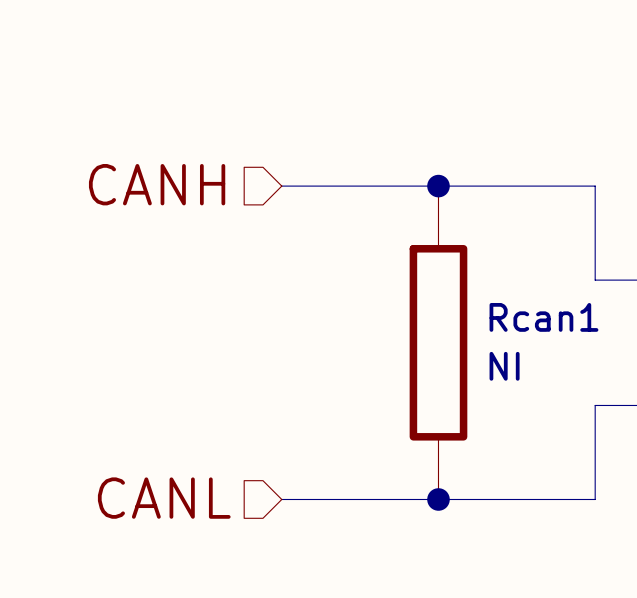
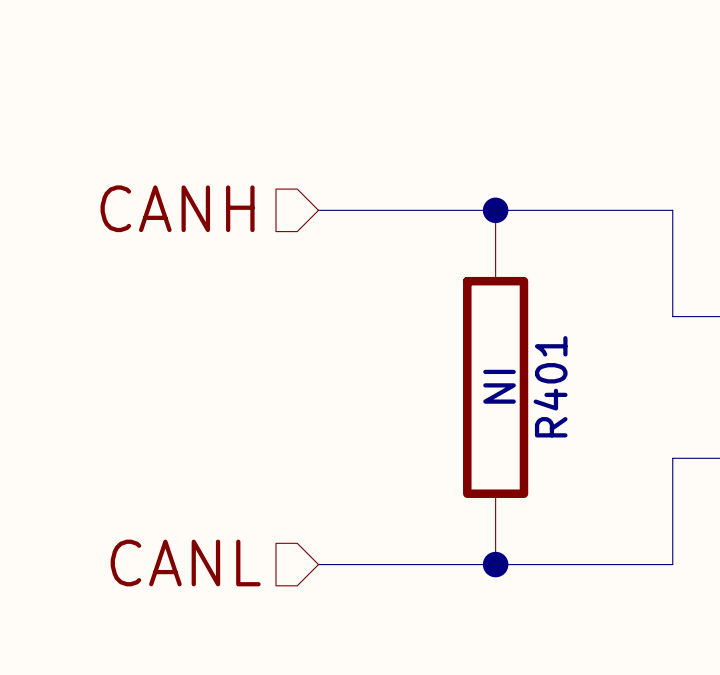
Rcan1 name: Rcan1 (543, 317) -> R401 (550, 386)
Rcan1 value rotation: 0° (504, 366) -> 90° counterclockwise (499, 386)
Rcan1 value position: NI (504, 366) -> NI (499, 386)

